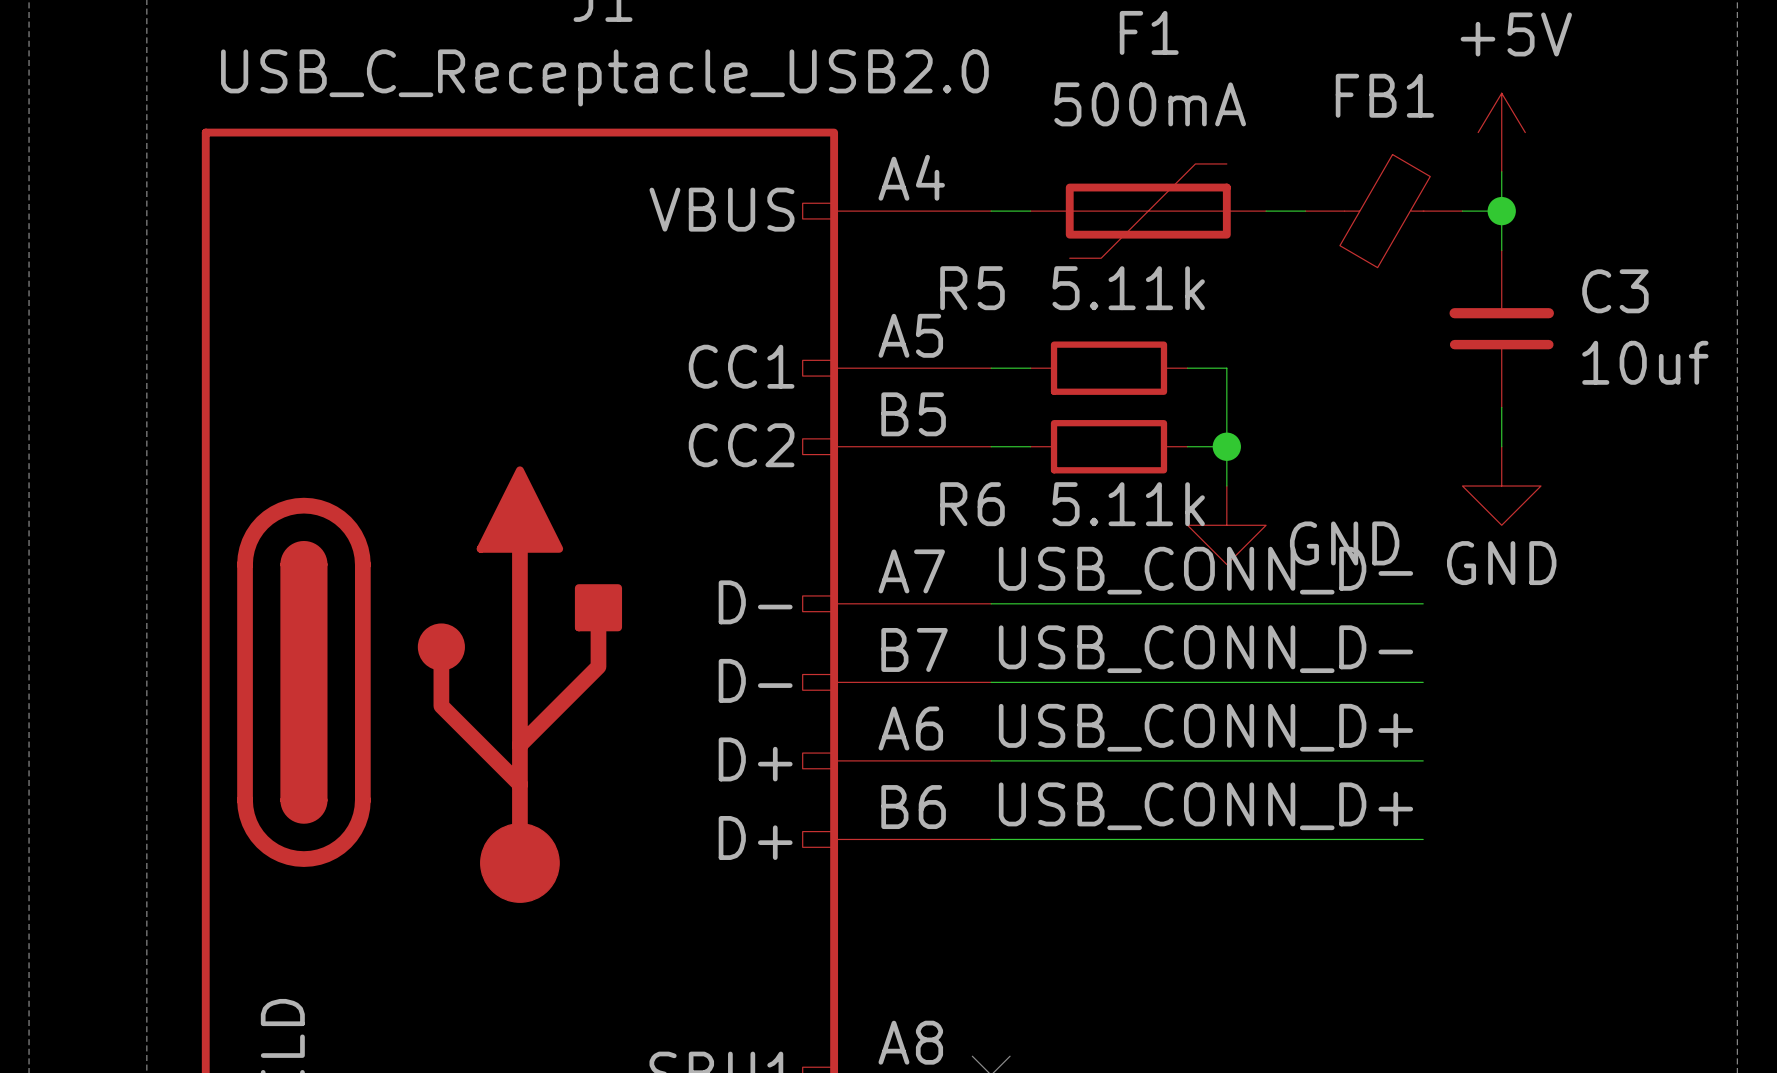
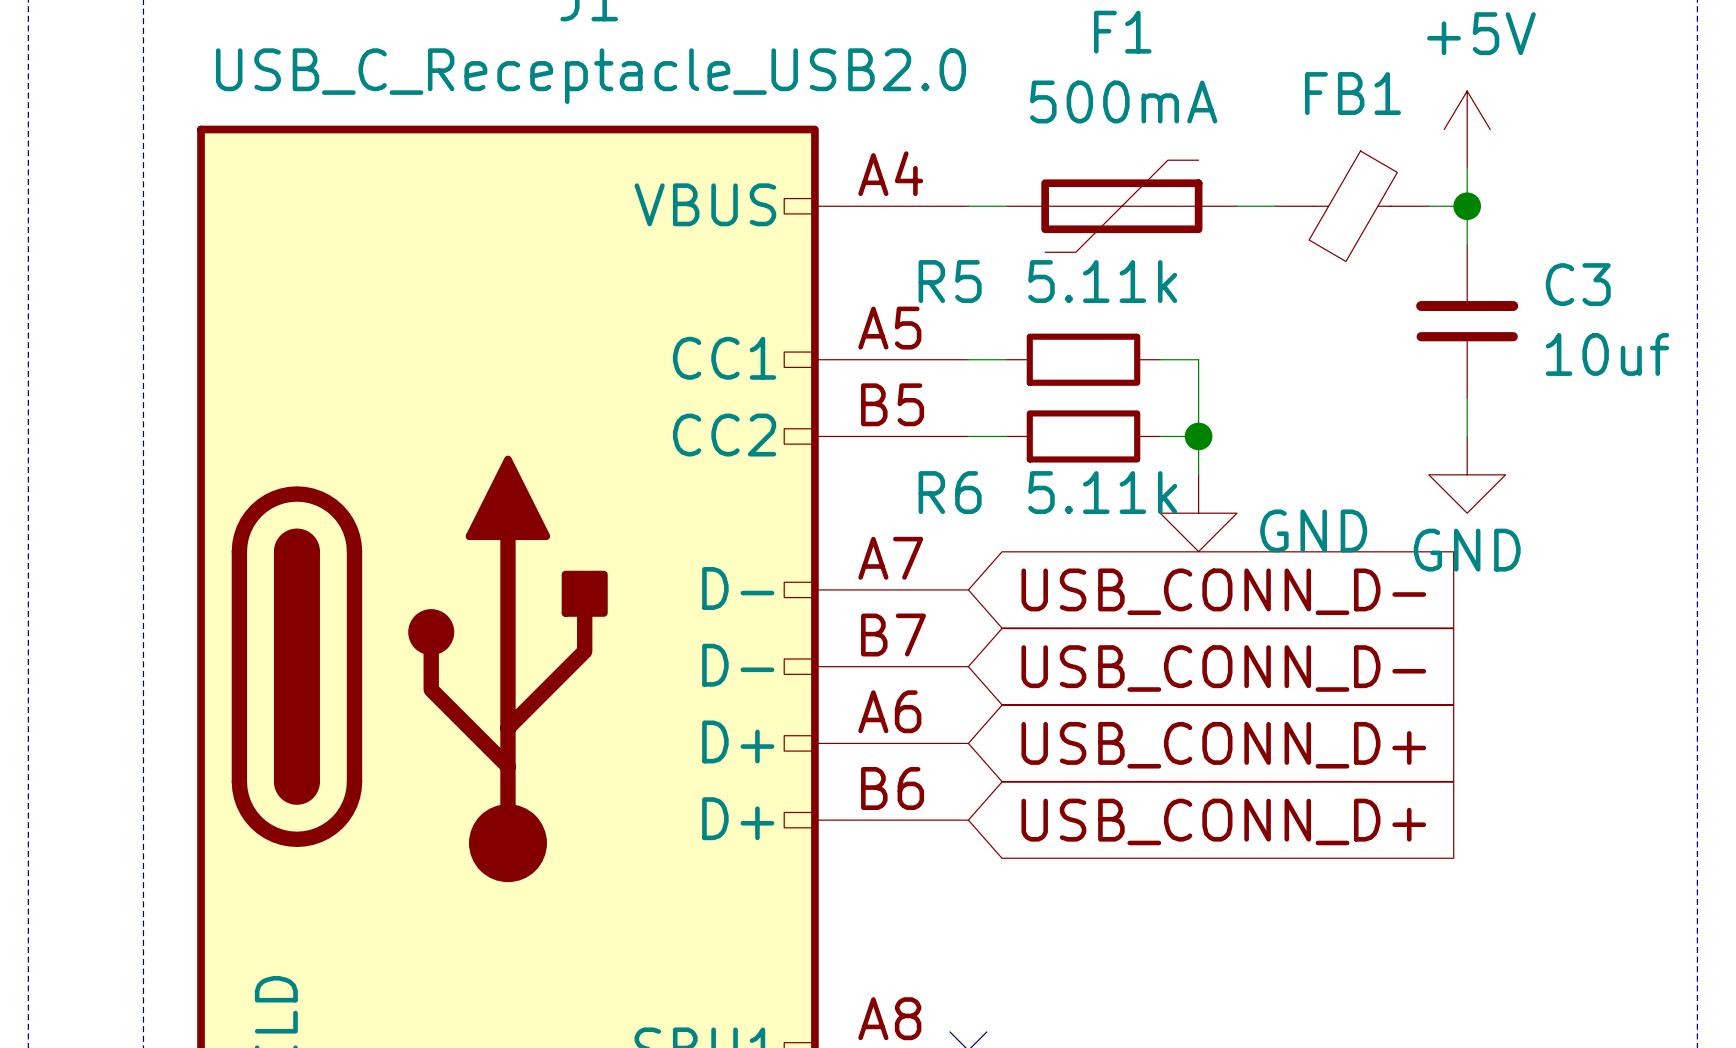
label: USB_CONN_D- (1205, 570) -> none
wire: (991, 603) (1423, 603) -> none
global label: none -> USB_CONN_D- (1223, 591)
label: USB_CONN_D- (1205, 649) -> none
wire: (991, 682) (1423, 682) -> none
global label: none -> USB_CONN_D- (1223, 668)
label: USB_CONN_D+ (1205, 727) -> none
wire: (991, 760) (1423, 760) -> none
global label: none -> USB_CONN_D+ (1223, 745)
label: USB_CONN_D+ (1205, 806) -> none
wire: (991, 839) (1423, 839) -> none
global label: none -> USB_CONN_D+ (1223, 821)

